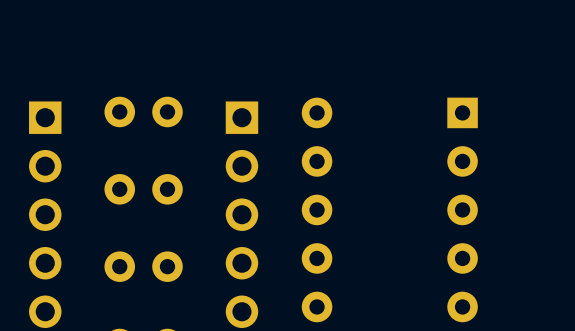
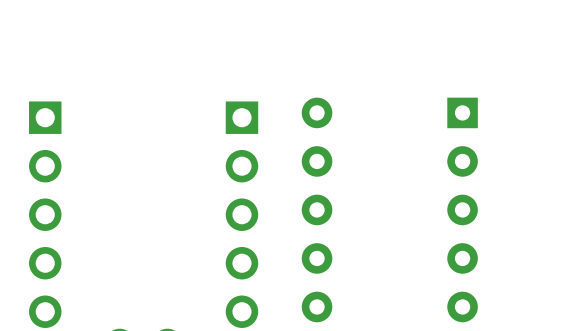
part: (143, 111) -> none
part: (143, 189) -> none
part: (143, 266) -> none

